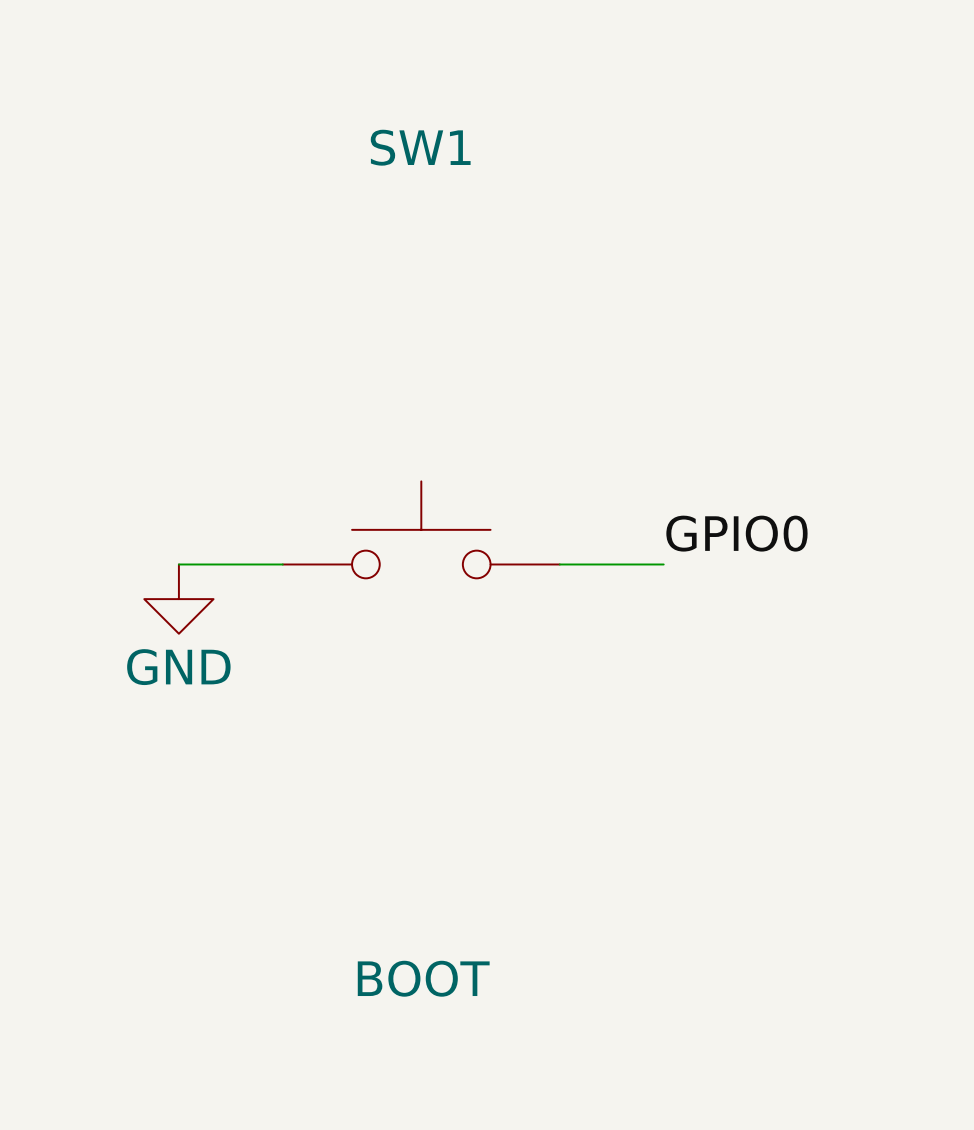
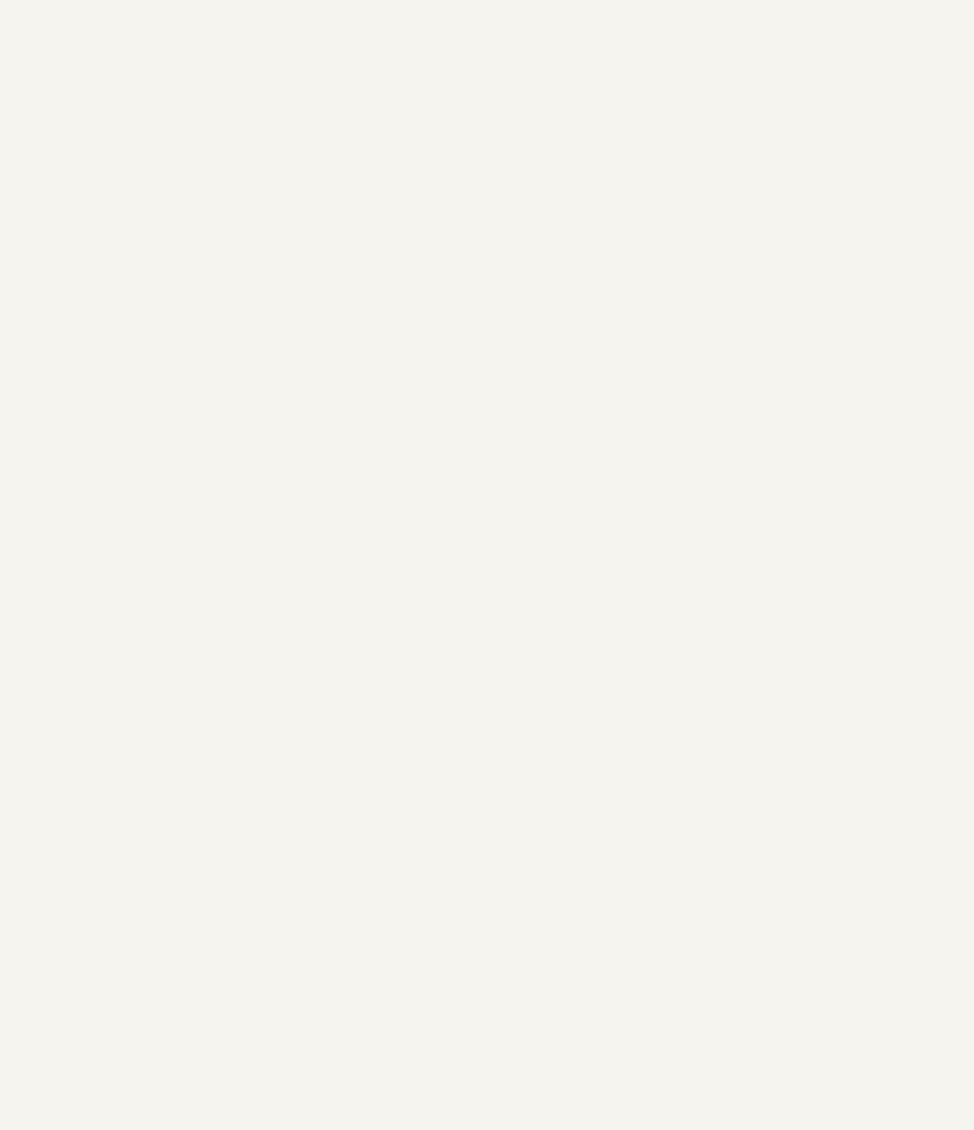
SW1: BOOT (421, 529) -> none
label: GPIO0 (736, 533) -> none
wire: (178, 564) (282, 564) -> none
wire: (559, 564) (663, 564) -> none
power symbol: GND (178, 599) -> none

